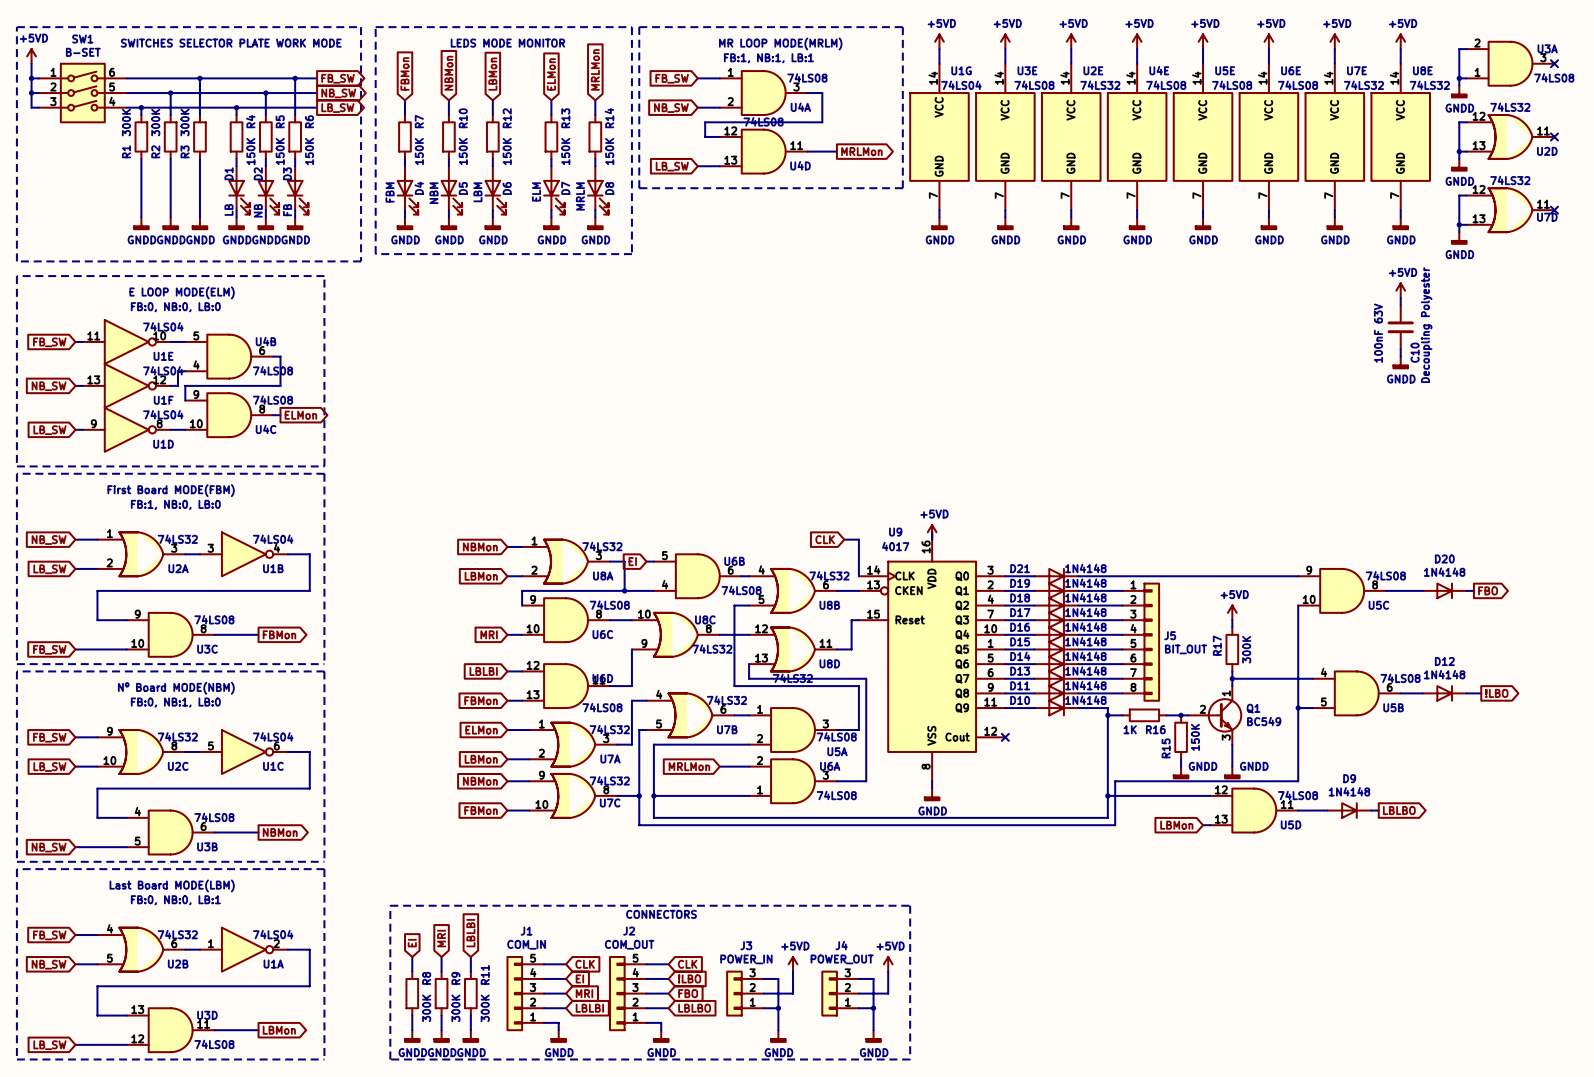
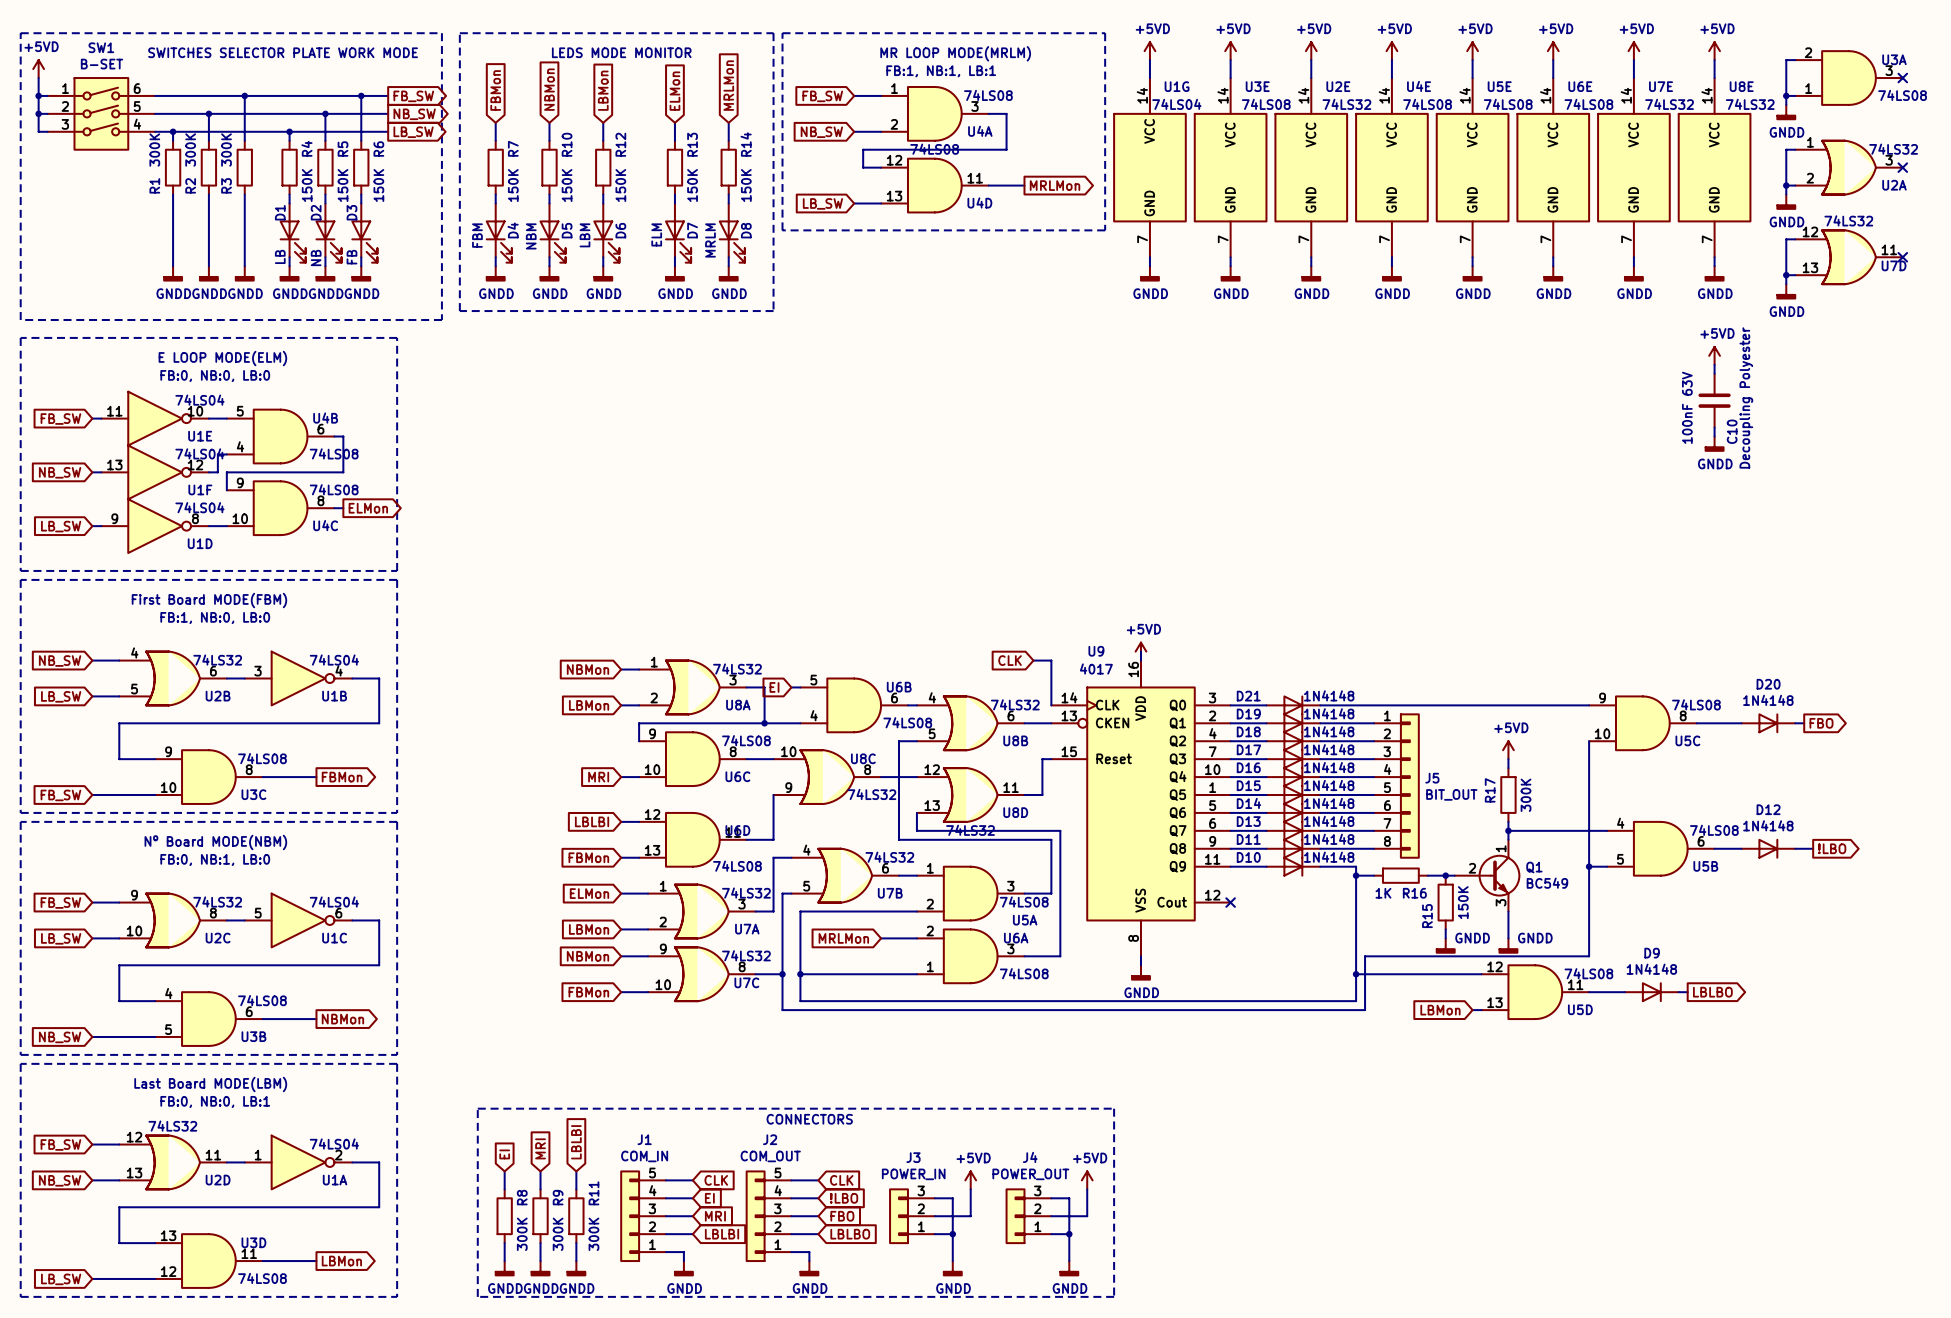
U2D position: (1510, 136) -> (173, 1162)
U2A position: (141, 554) -> (1849, 167)
U2B position: (141, 949) -> (173, 678)

